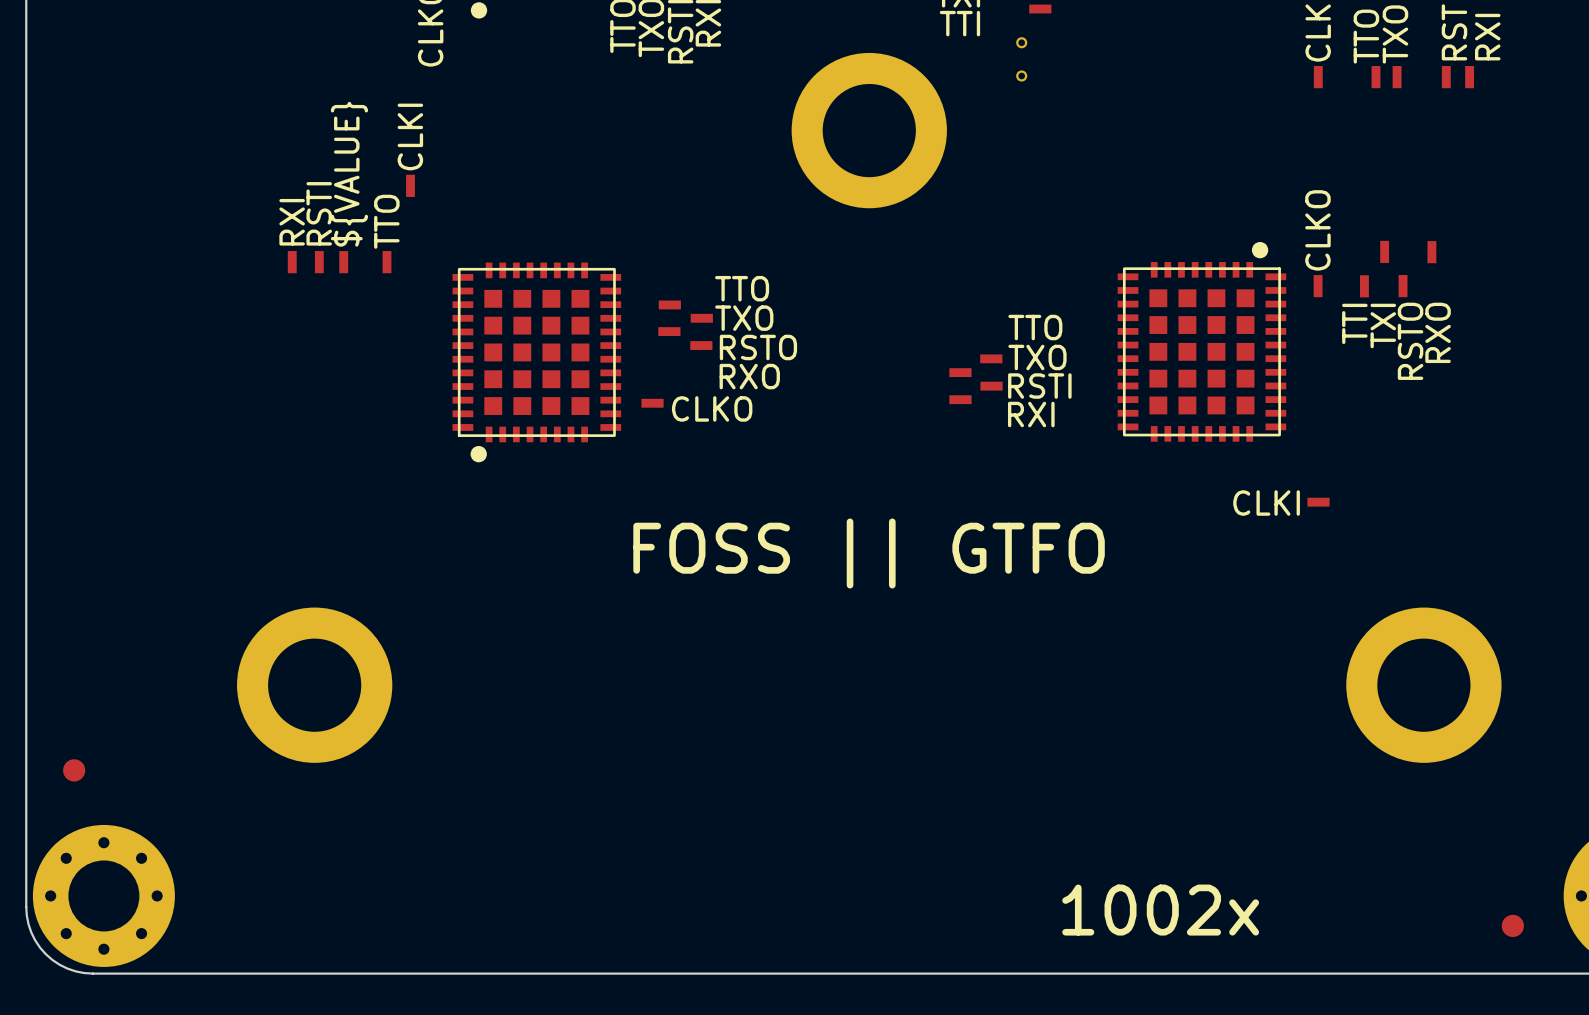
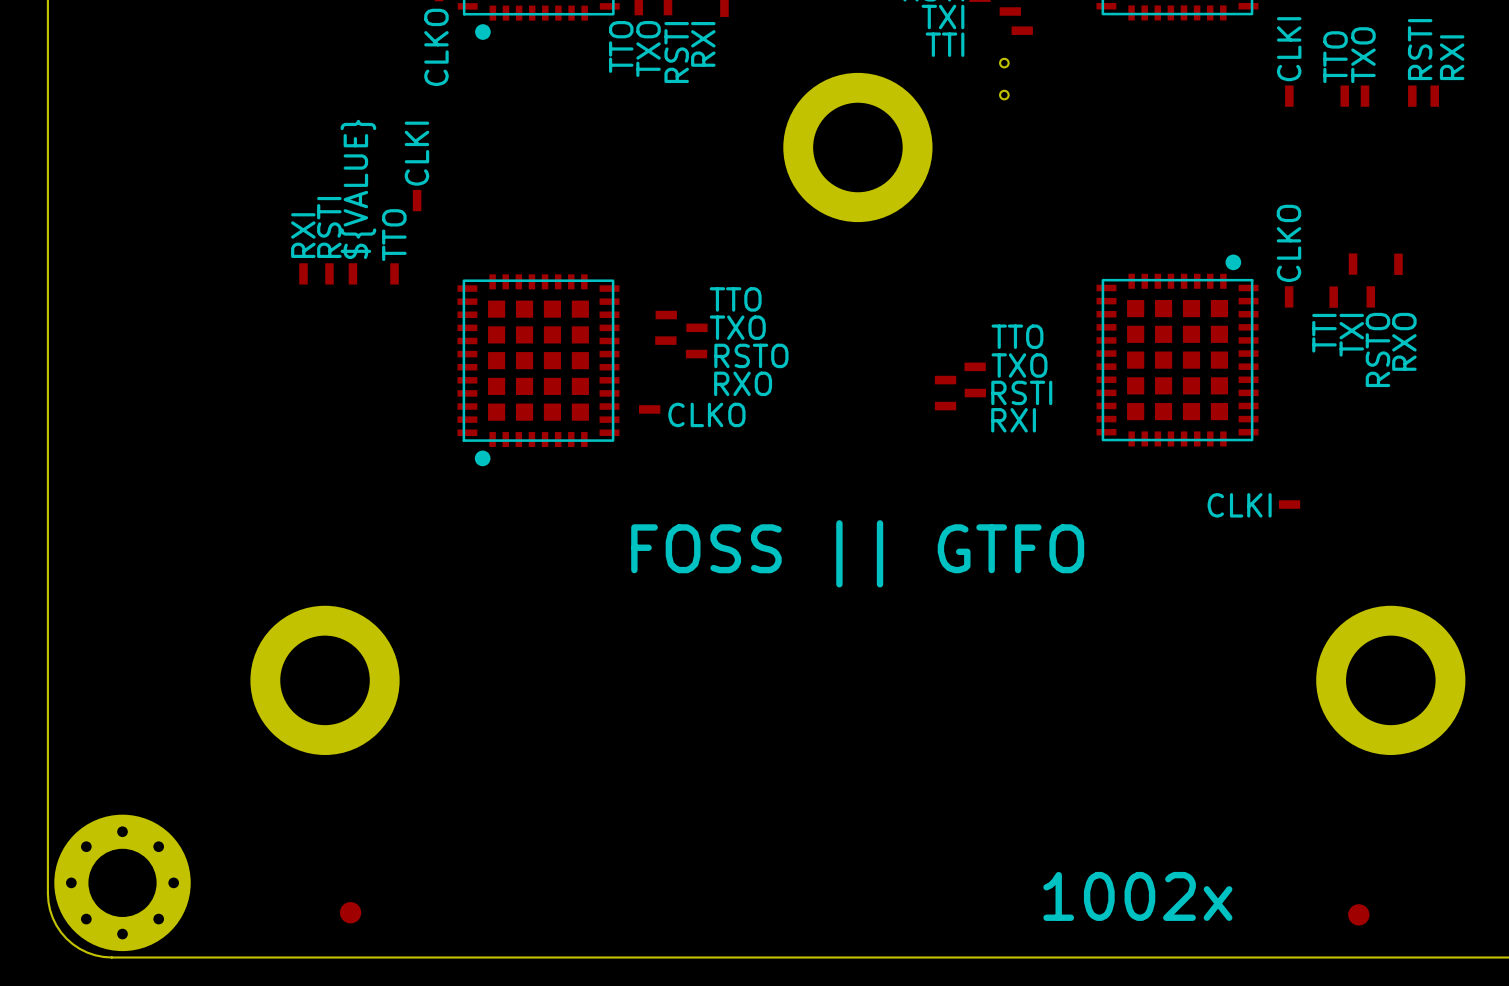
part position: (74, 770) -> (350, 912)
part position: (1512, 925) -> (1358, 914)

